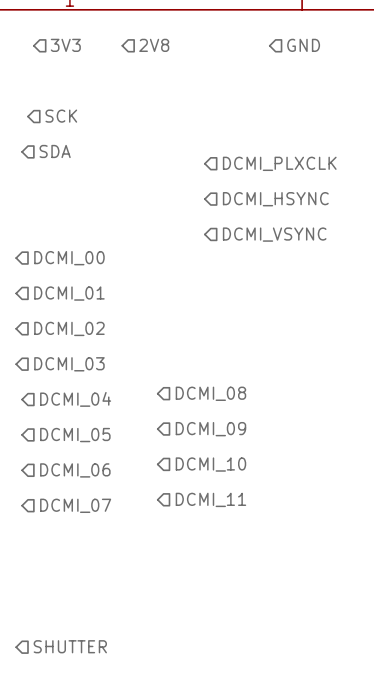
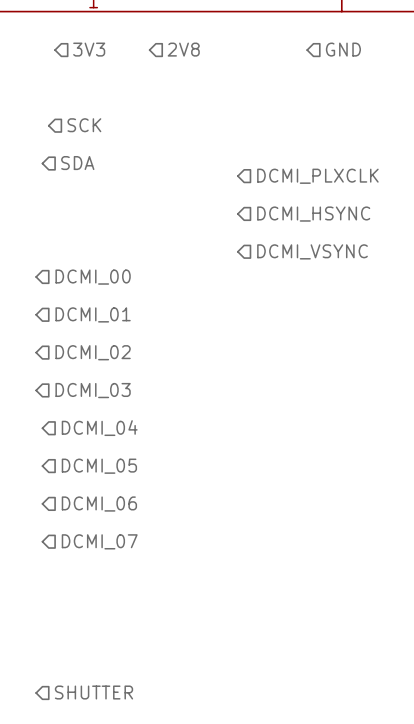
hierarchical label: DCMI_08 (210, 393) -> none
hierarchical label: DCMI_09 (210, 429) -> none
hierarchical label: DCMI_10 (210, 464) -> none
hierarchical label: DCMI_11 (210, 499) -> none

